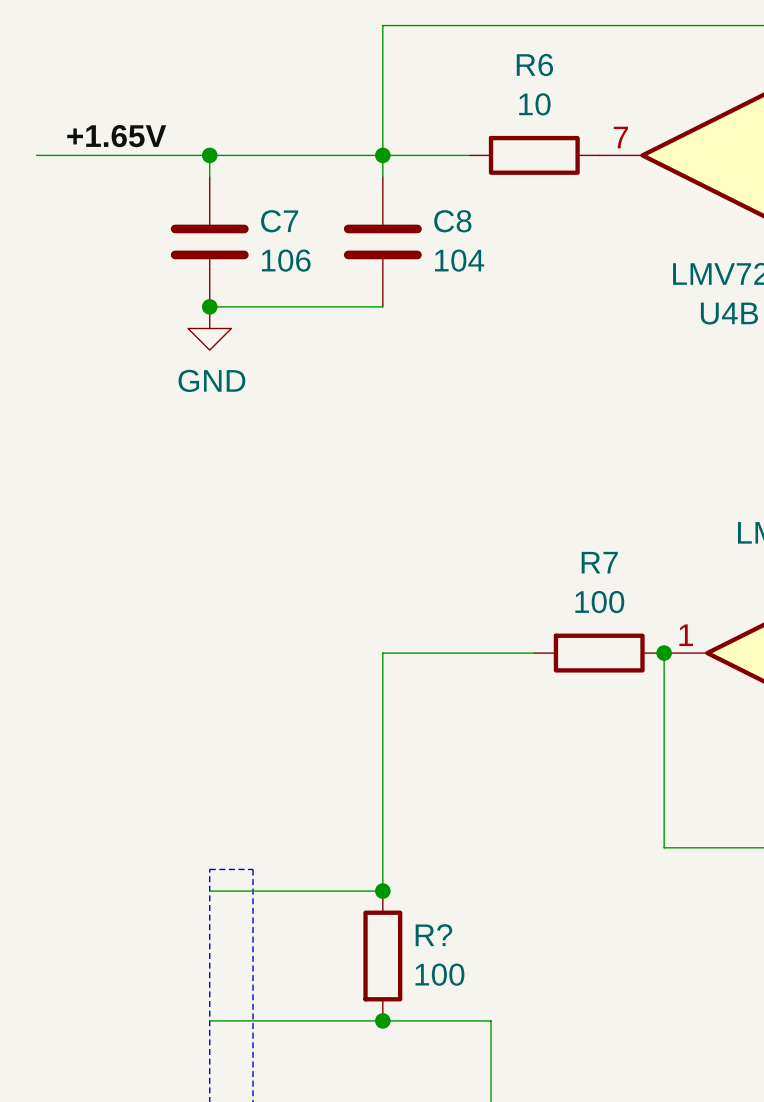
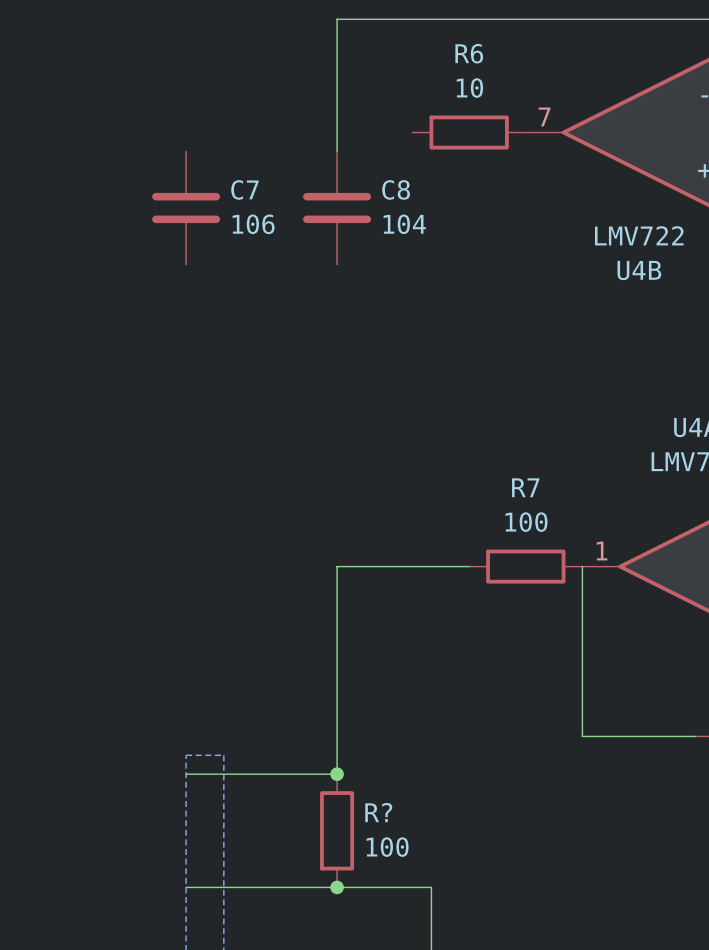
label: +1.65V (116, 136) -> none
wire: (36, 155) (469, 155) -> none
wire: (209, 155) (209, 177) -> none
junction: (209, 155) -> none
junction: (382, 155) -> none
wire: (209, 306) (382, 306) -> none
junction: (209, 306) -> none
power symbol: GND (209, 328) -> none
junction: (664, 653) -> none

